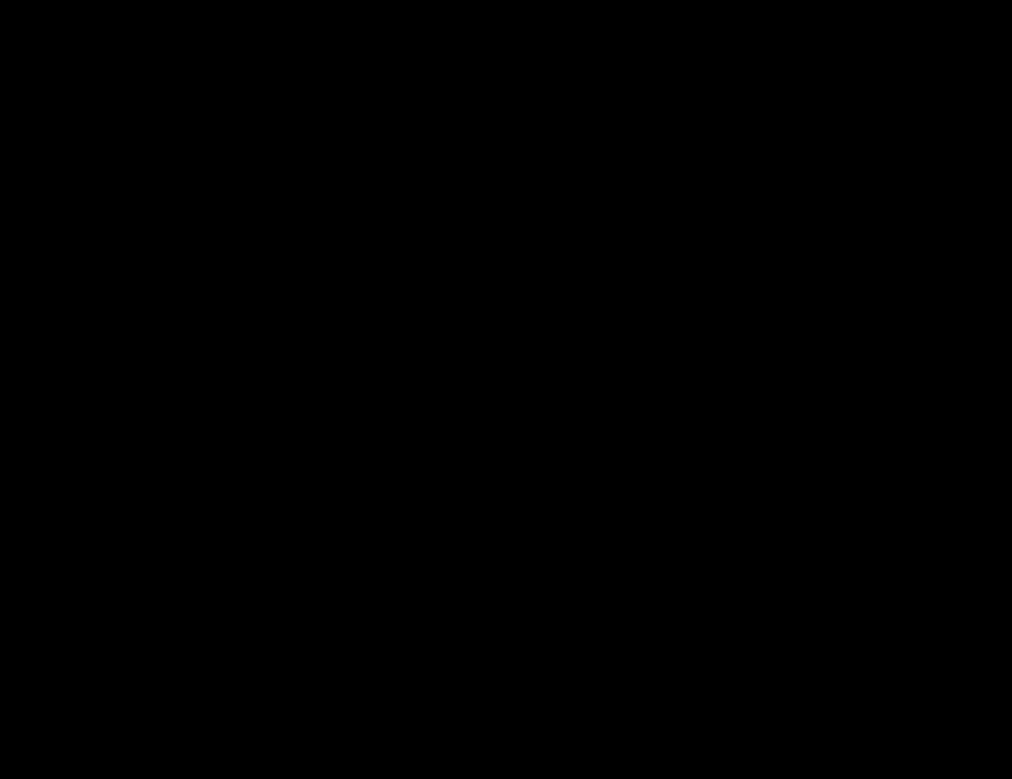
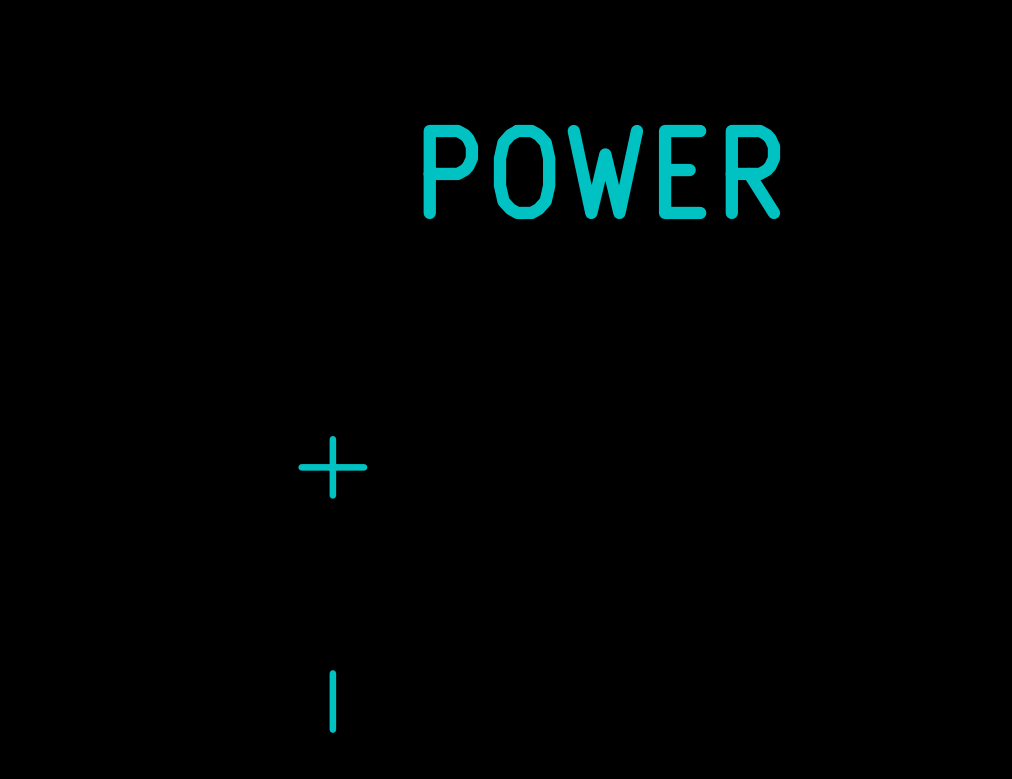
text: none -> POWER (601, 171)
text: none -> + (332, 467)
text: none -> - (332, 701)

